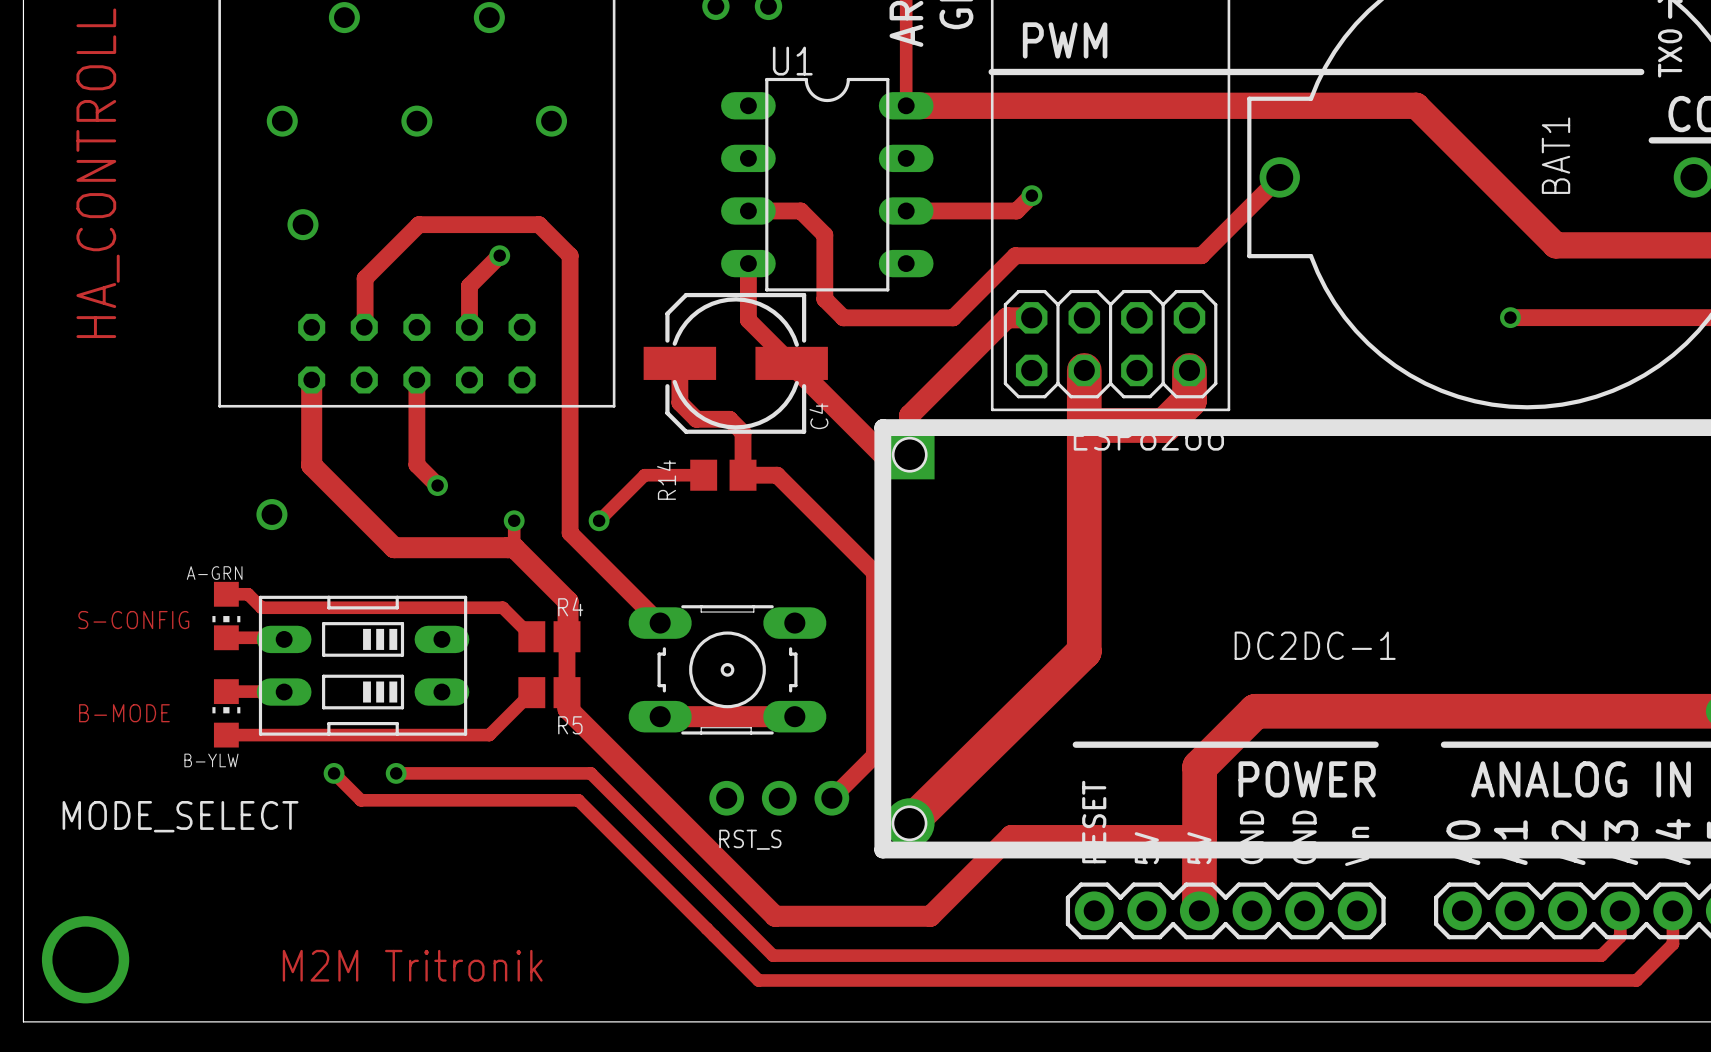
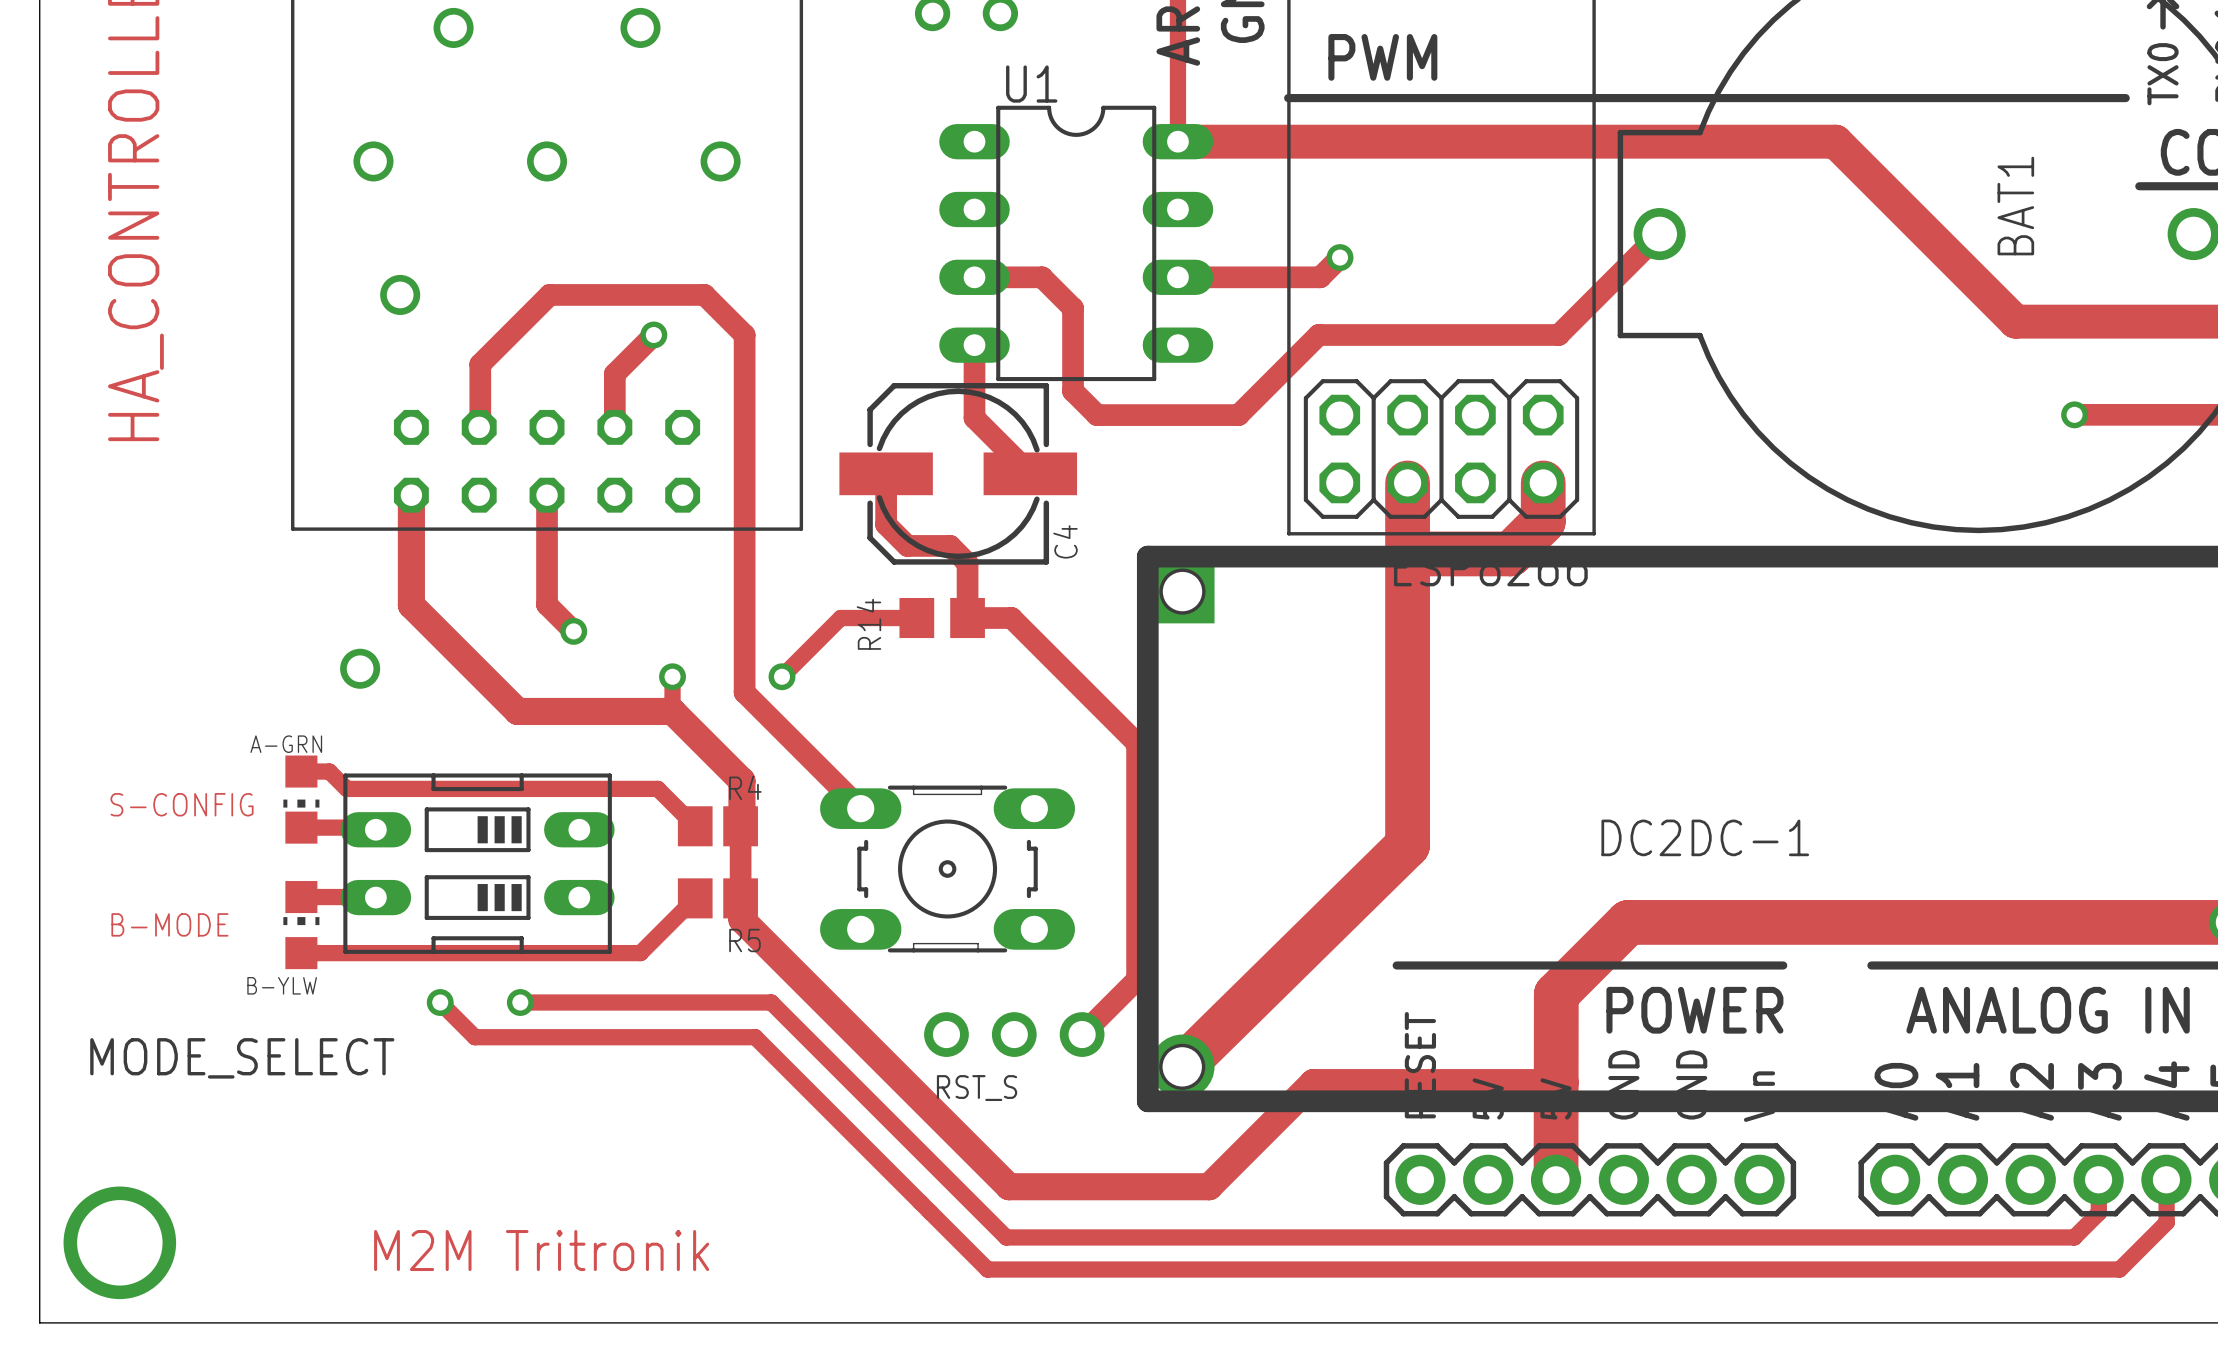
track: (1031, 317) (1007, 317) (909, 415) (909, 454) (882, 454) (791, 363) -> none
track: (1510, 317) (1601, 317) -> none
via position: (1510, 317) -> (2074, 414)
track: (660, 716) (794, 716) -> none

